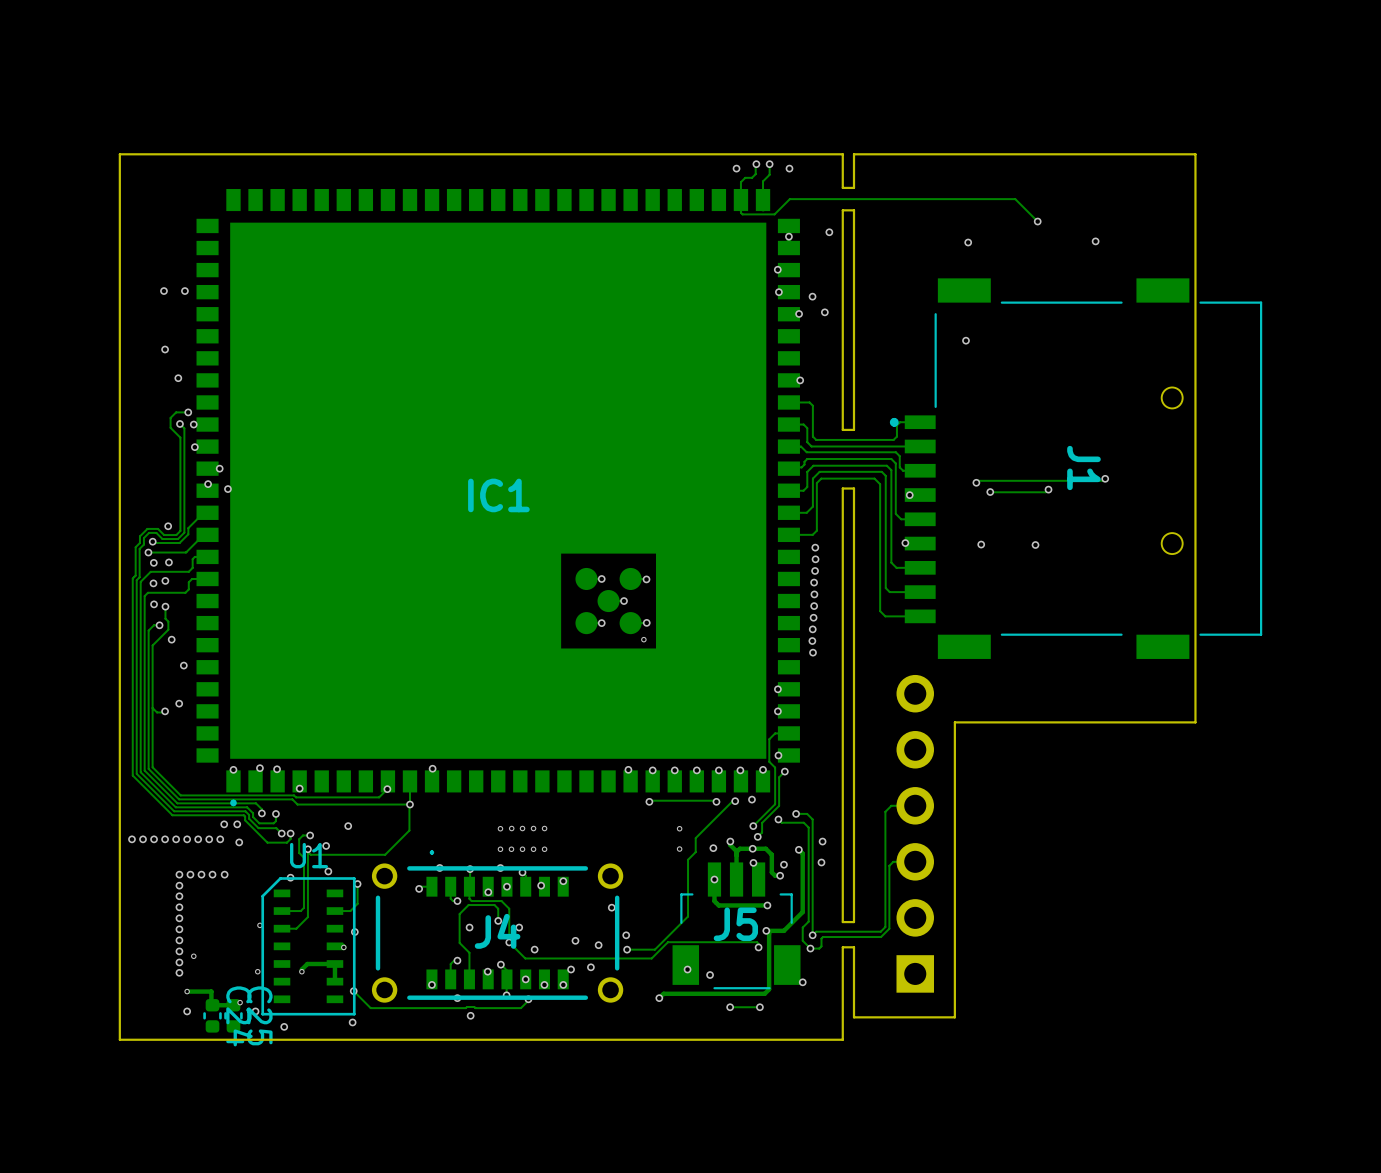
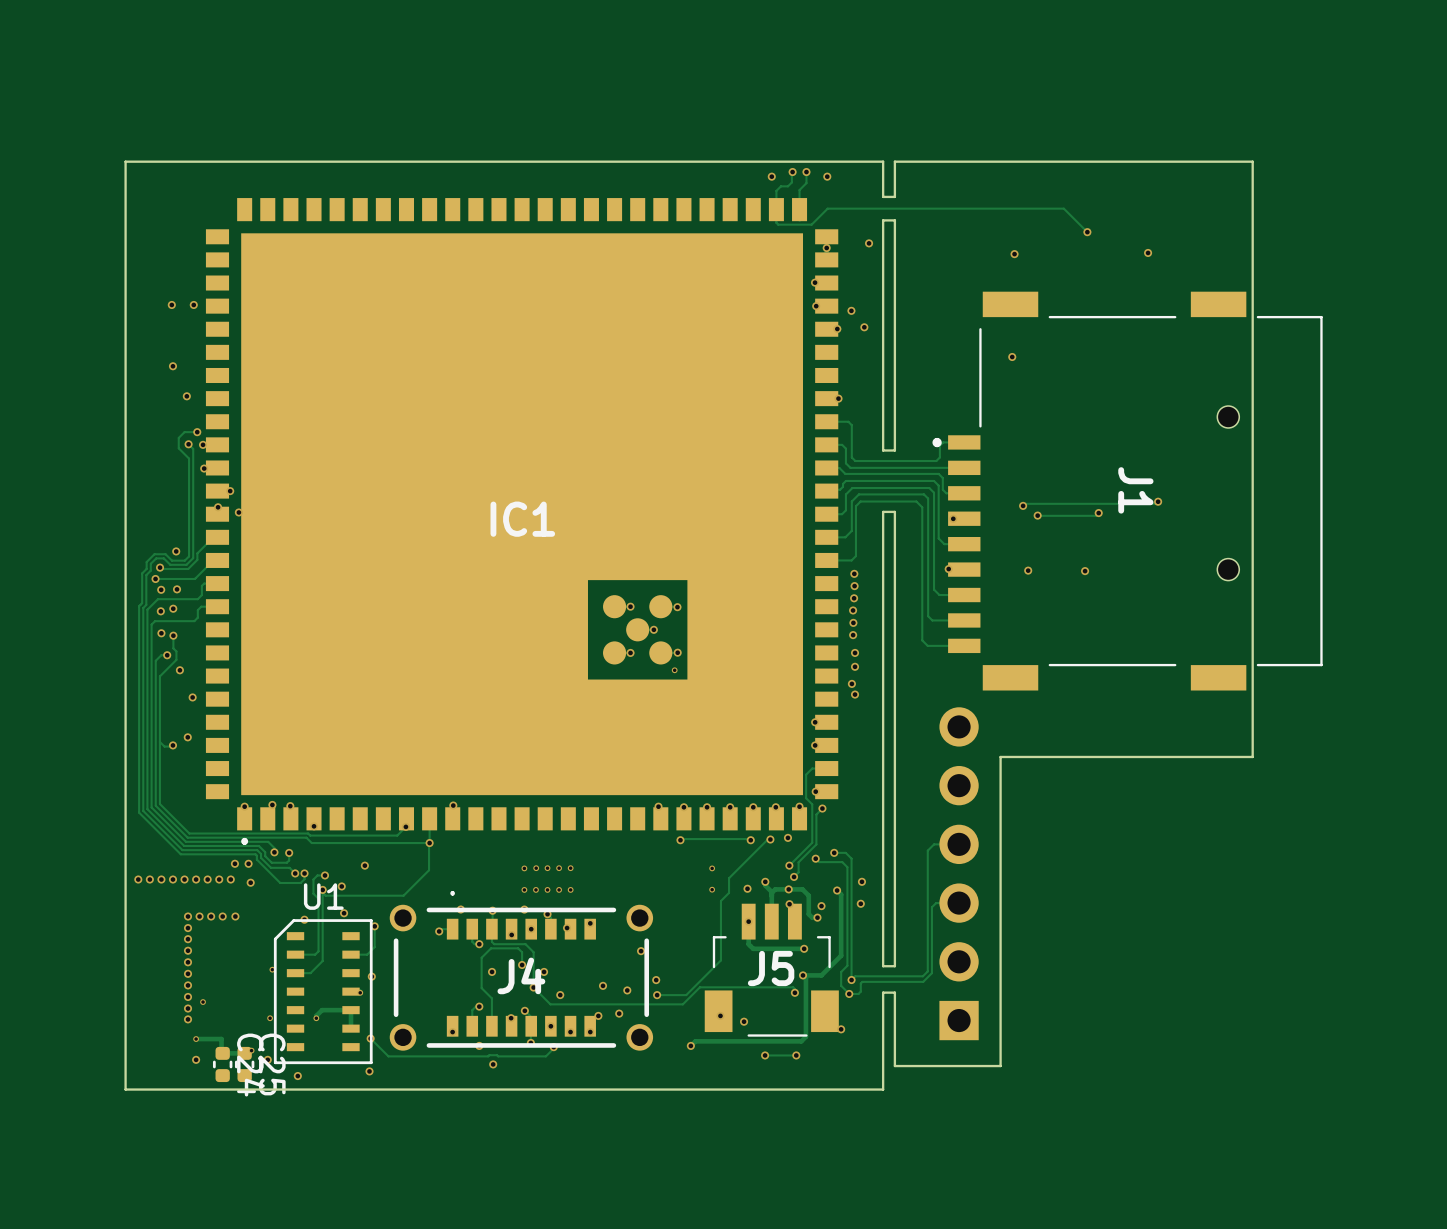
via: (813, 617) -> none
via: none -> (855, 652)
via: (812, 629) -> none
via: none -> (855, 666)
via: (812, 641) -> none
via: none -> (855, 694)

